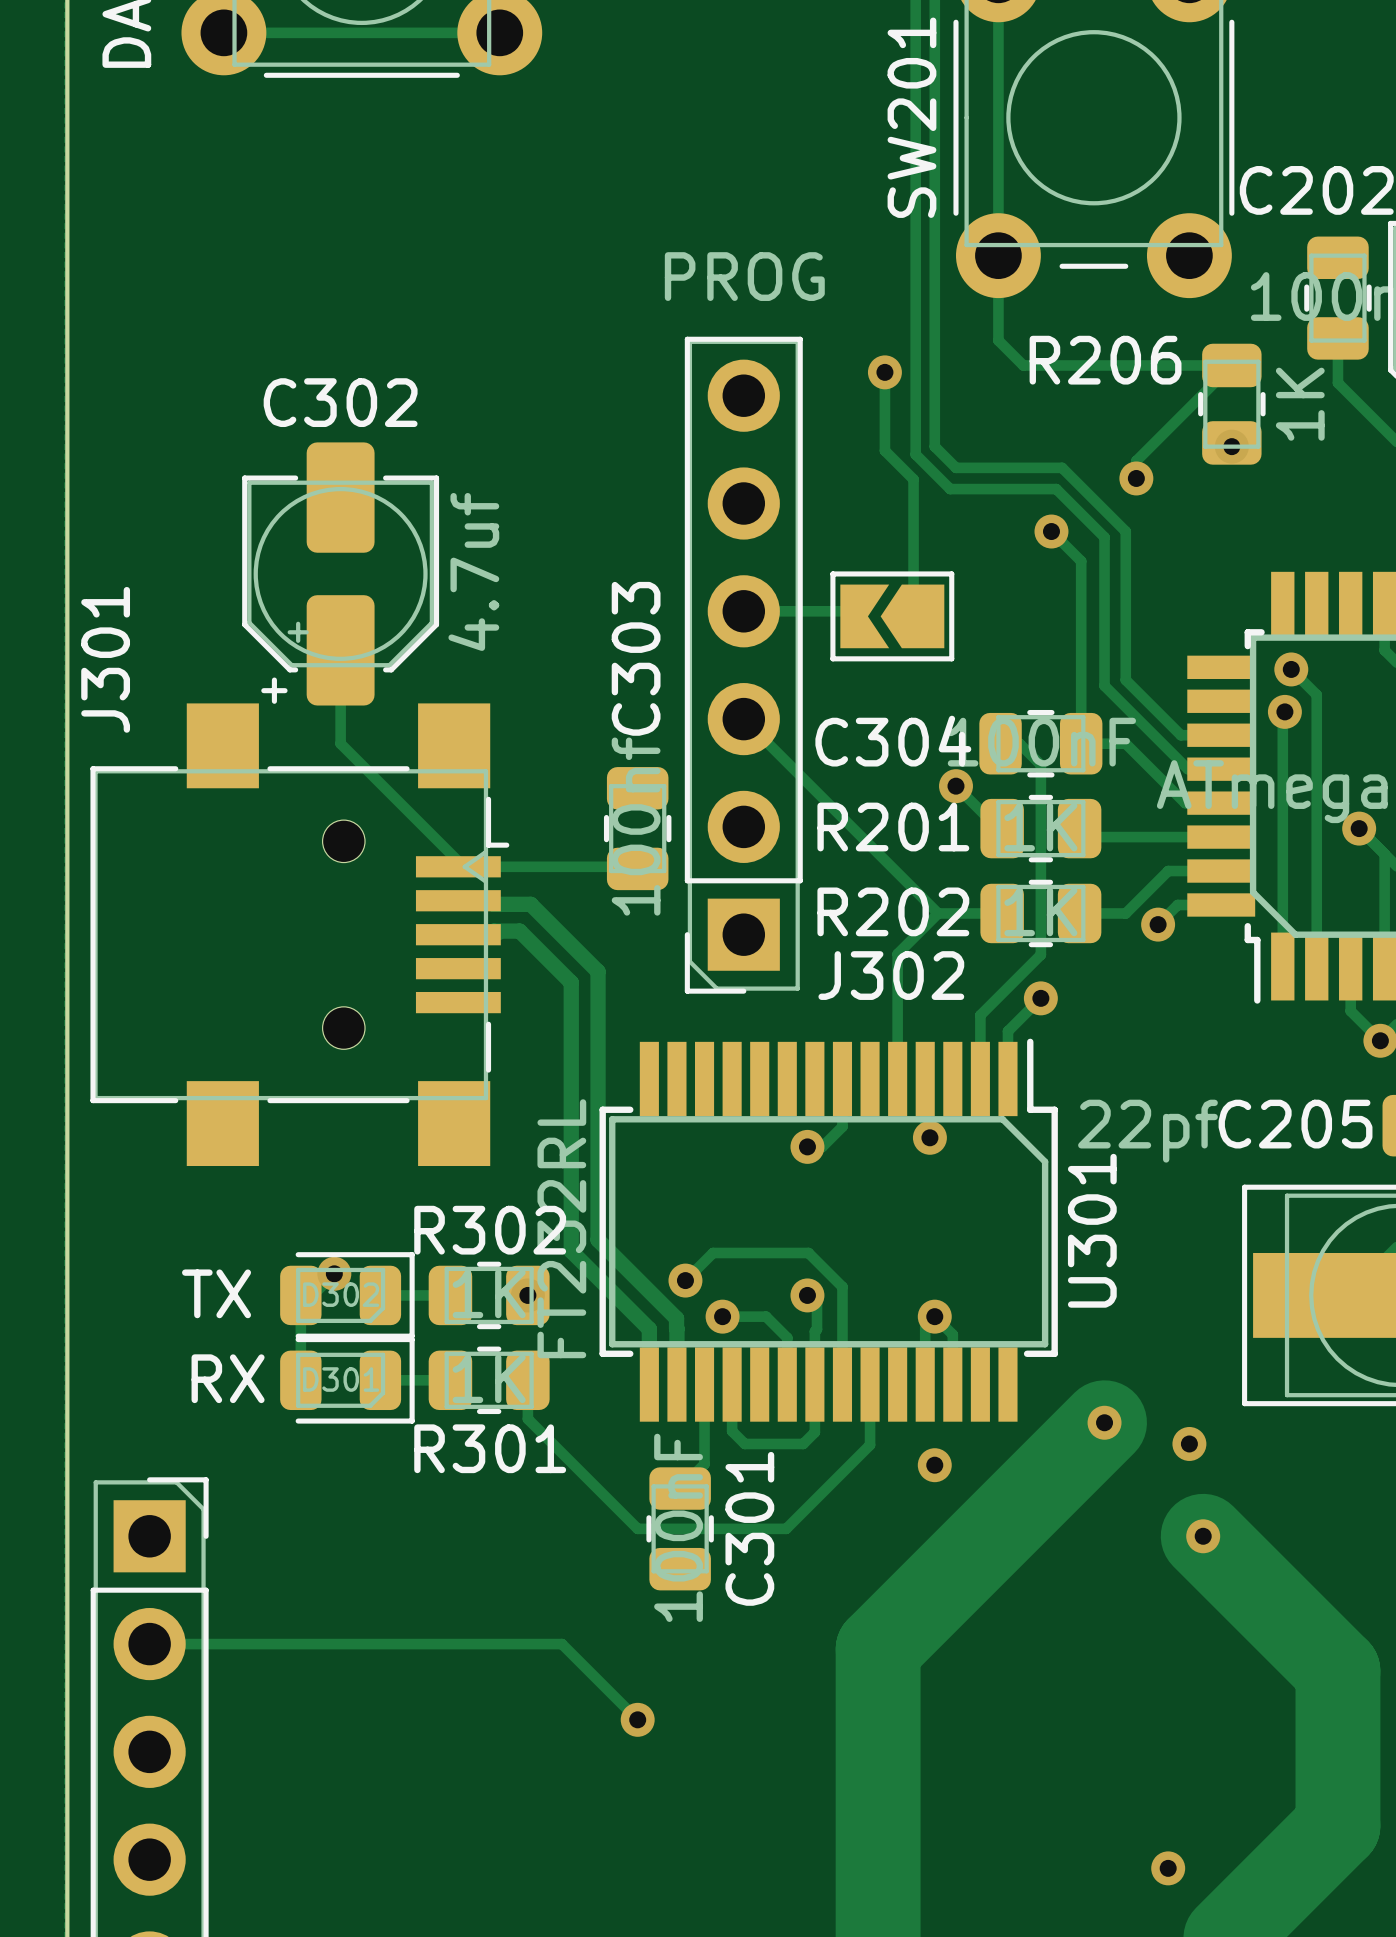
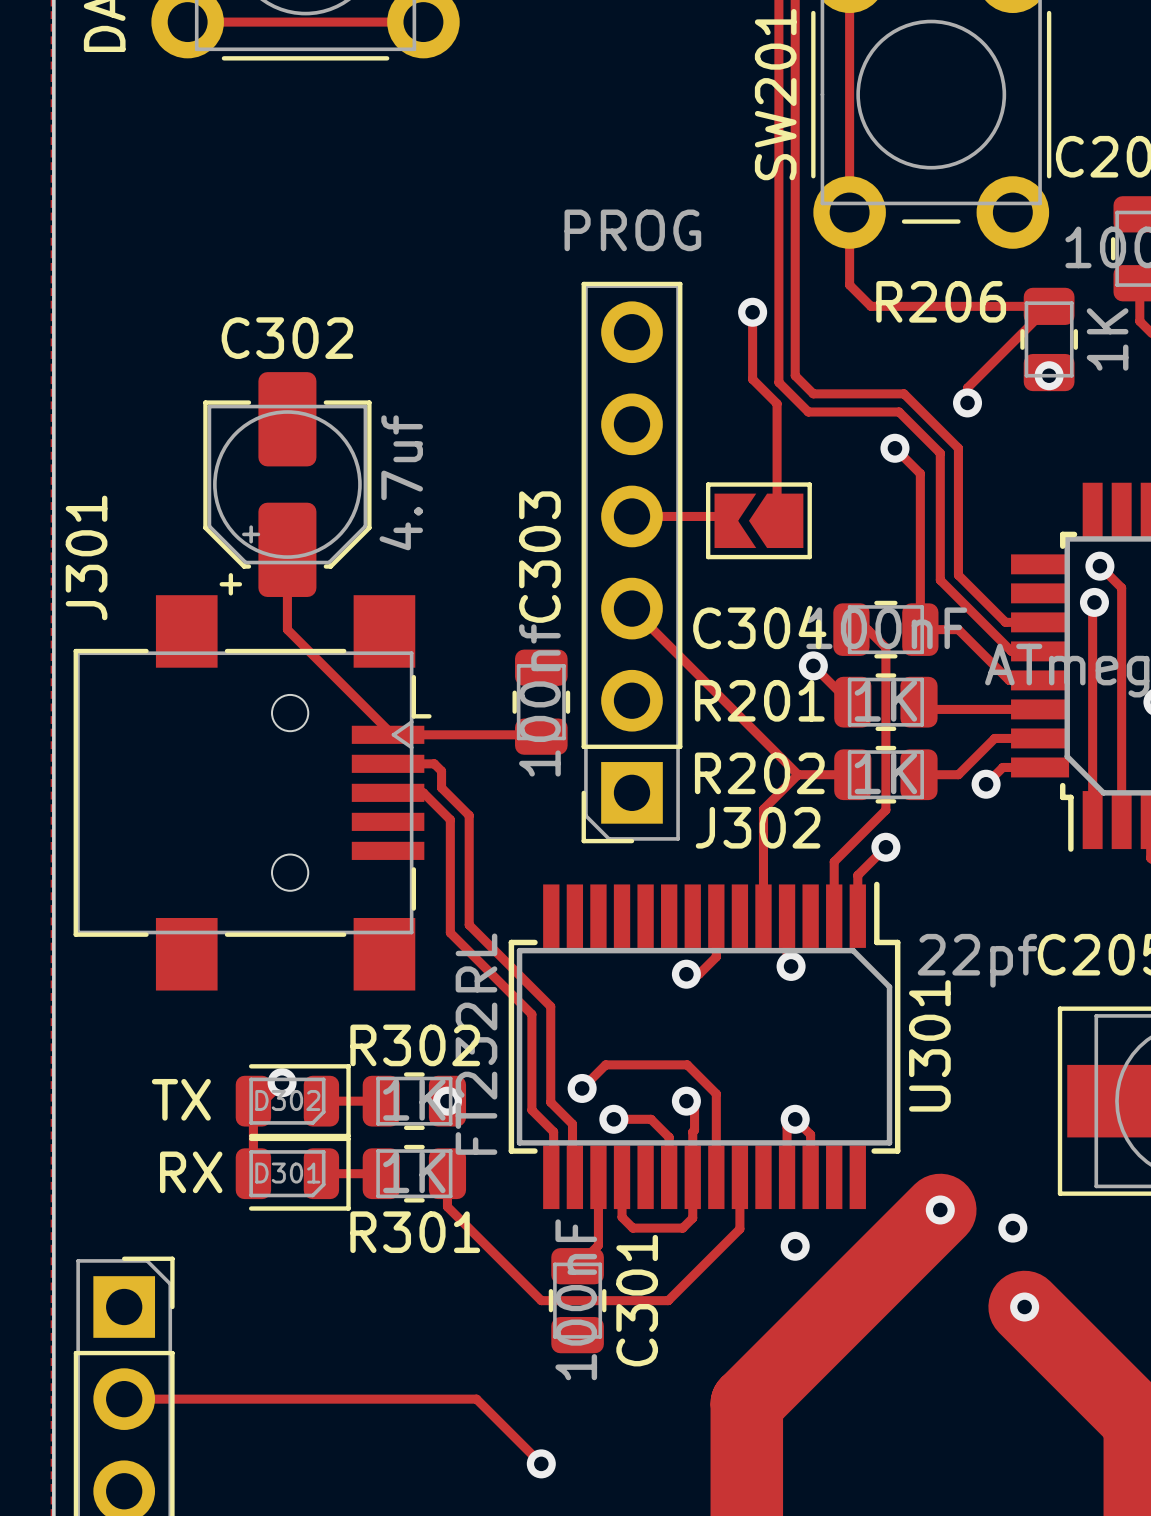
track: (490, 900) (493, 904) (530, 904) (598, 971) (598, 1239) (676, 1318) (676, 1384) -> (415, 763) (434, 763) (441, 771) (441, 787) (469, 815) (469, 925) (550, 1006) (550, 1102) (572, 1124) (572, 1151)
track: (458, 934) (490, 934) (493, 931) (519, 931) (571, 982) (571, 1251) (649, 1329) (649, 1384) -> none
track: none -> (423, 792) (450, 819) (450, 932) (531, 1014) (531, 1110) (553, 1131) (553, 1151)

